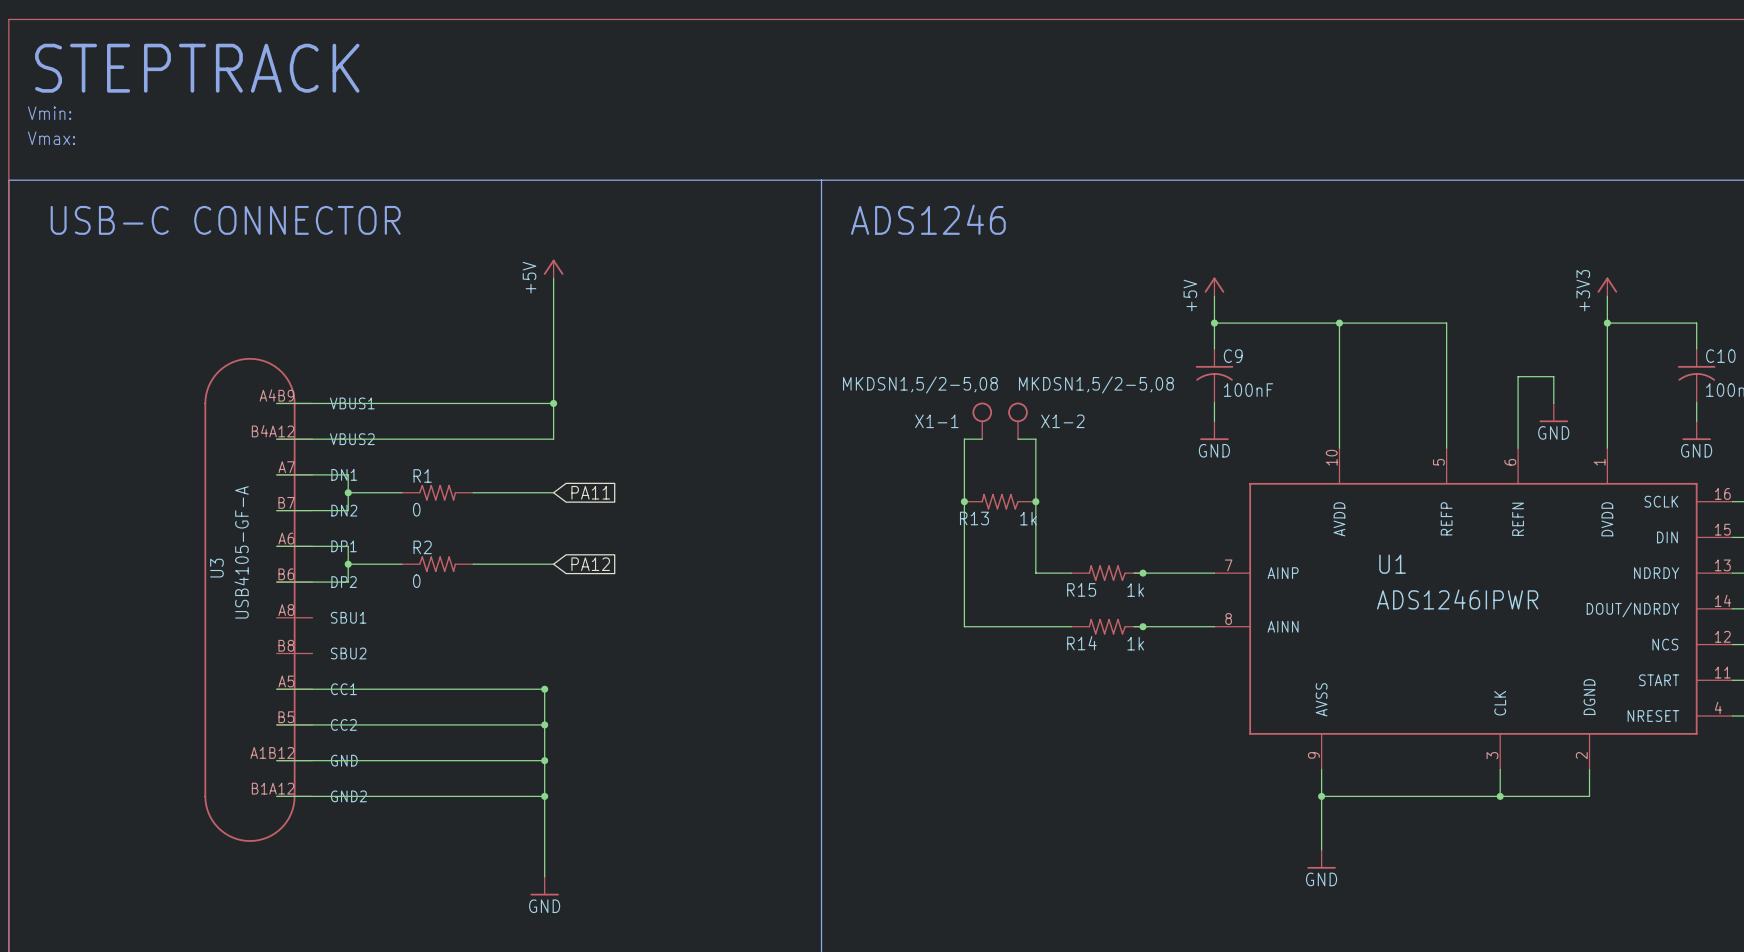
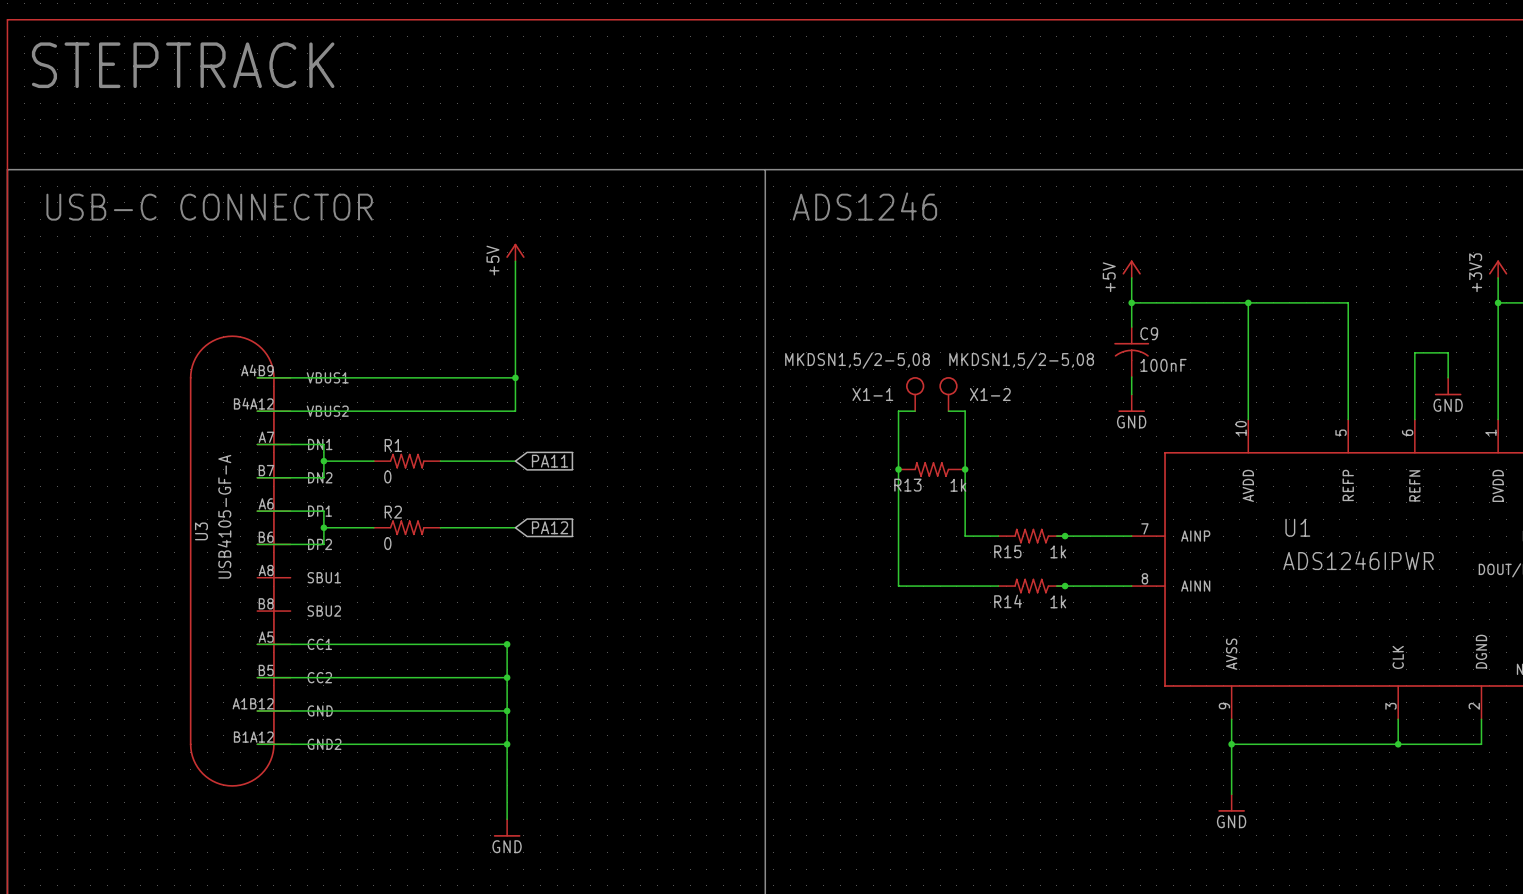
text: Vmin: (49, 113) -> none
text: Vmax: (51, 138) -> none

